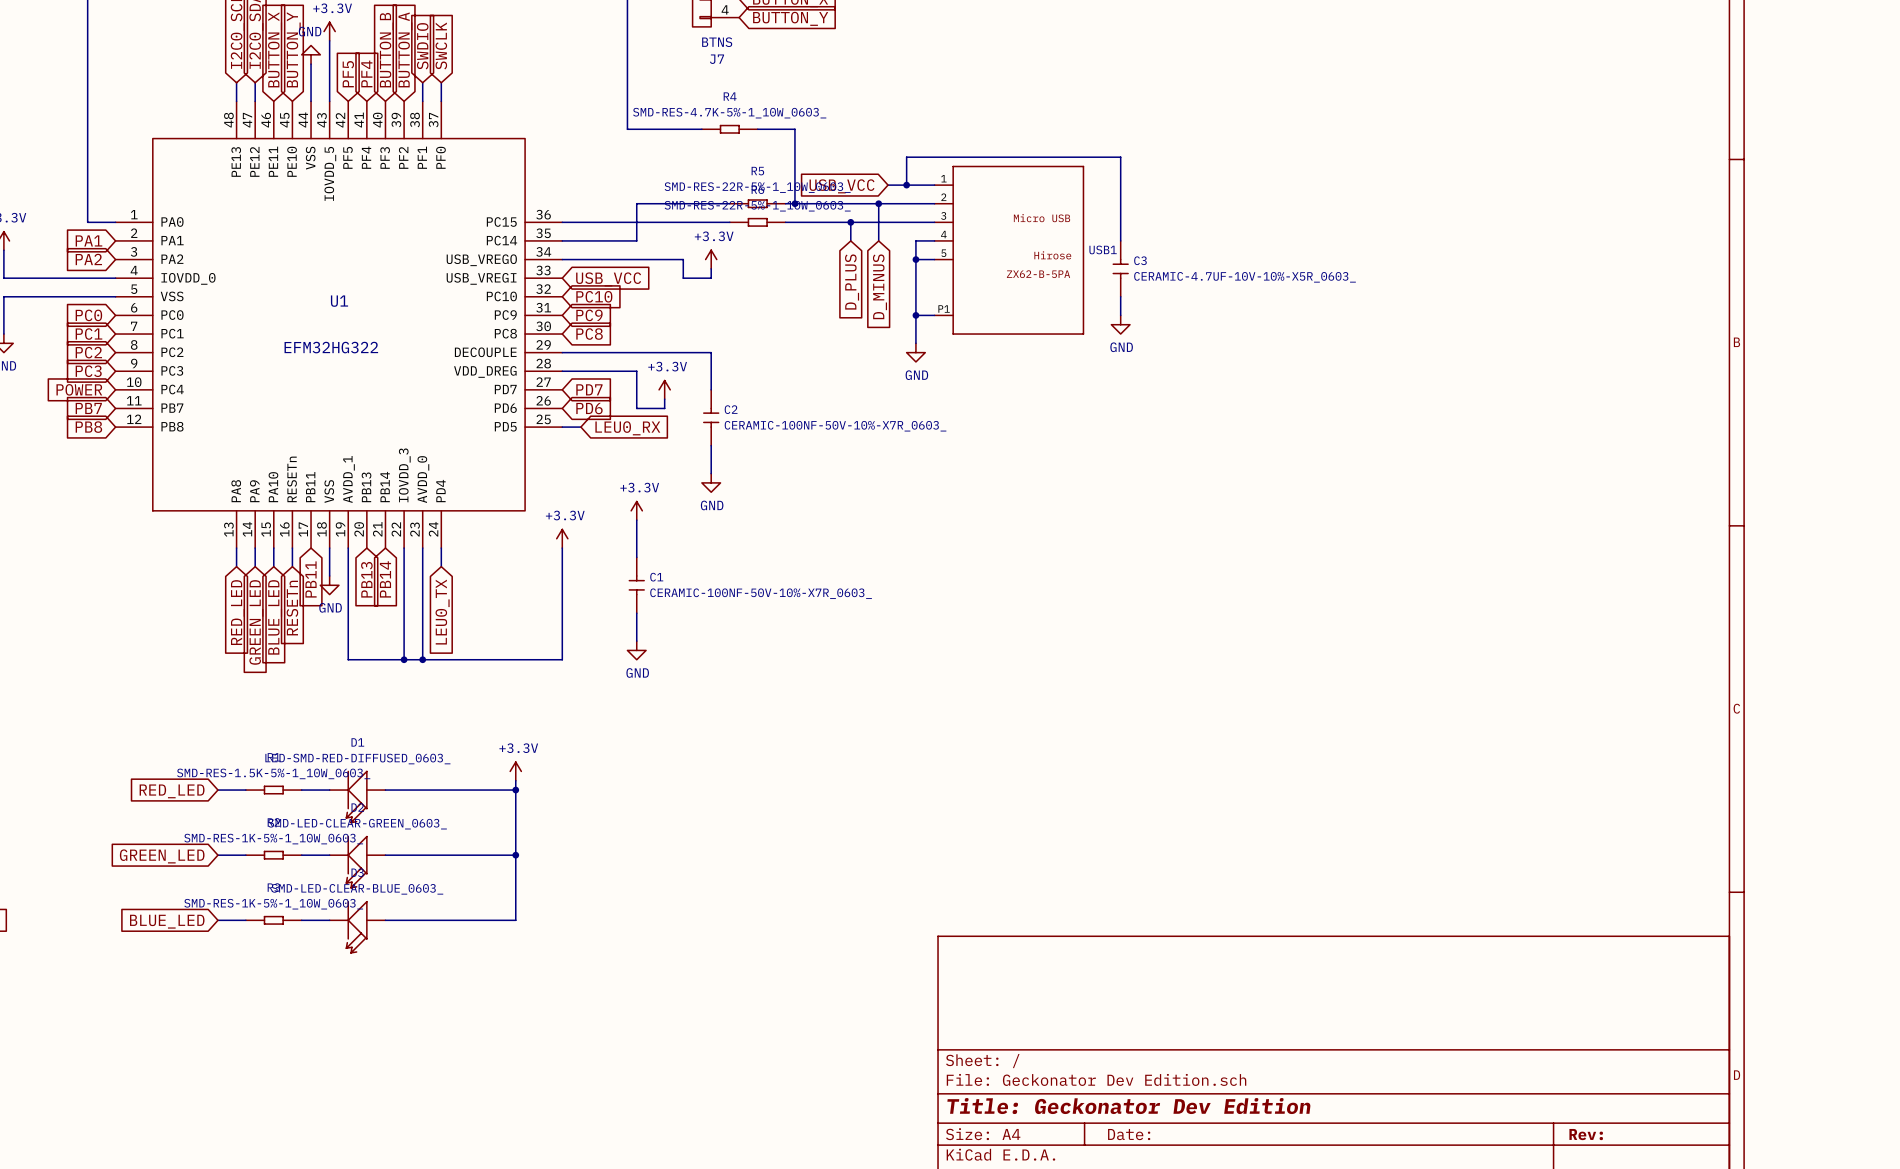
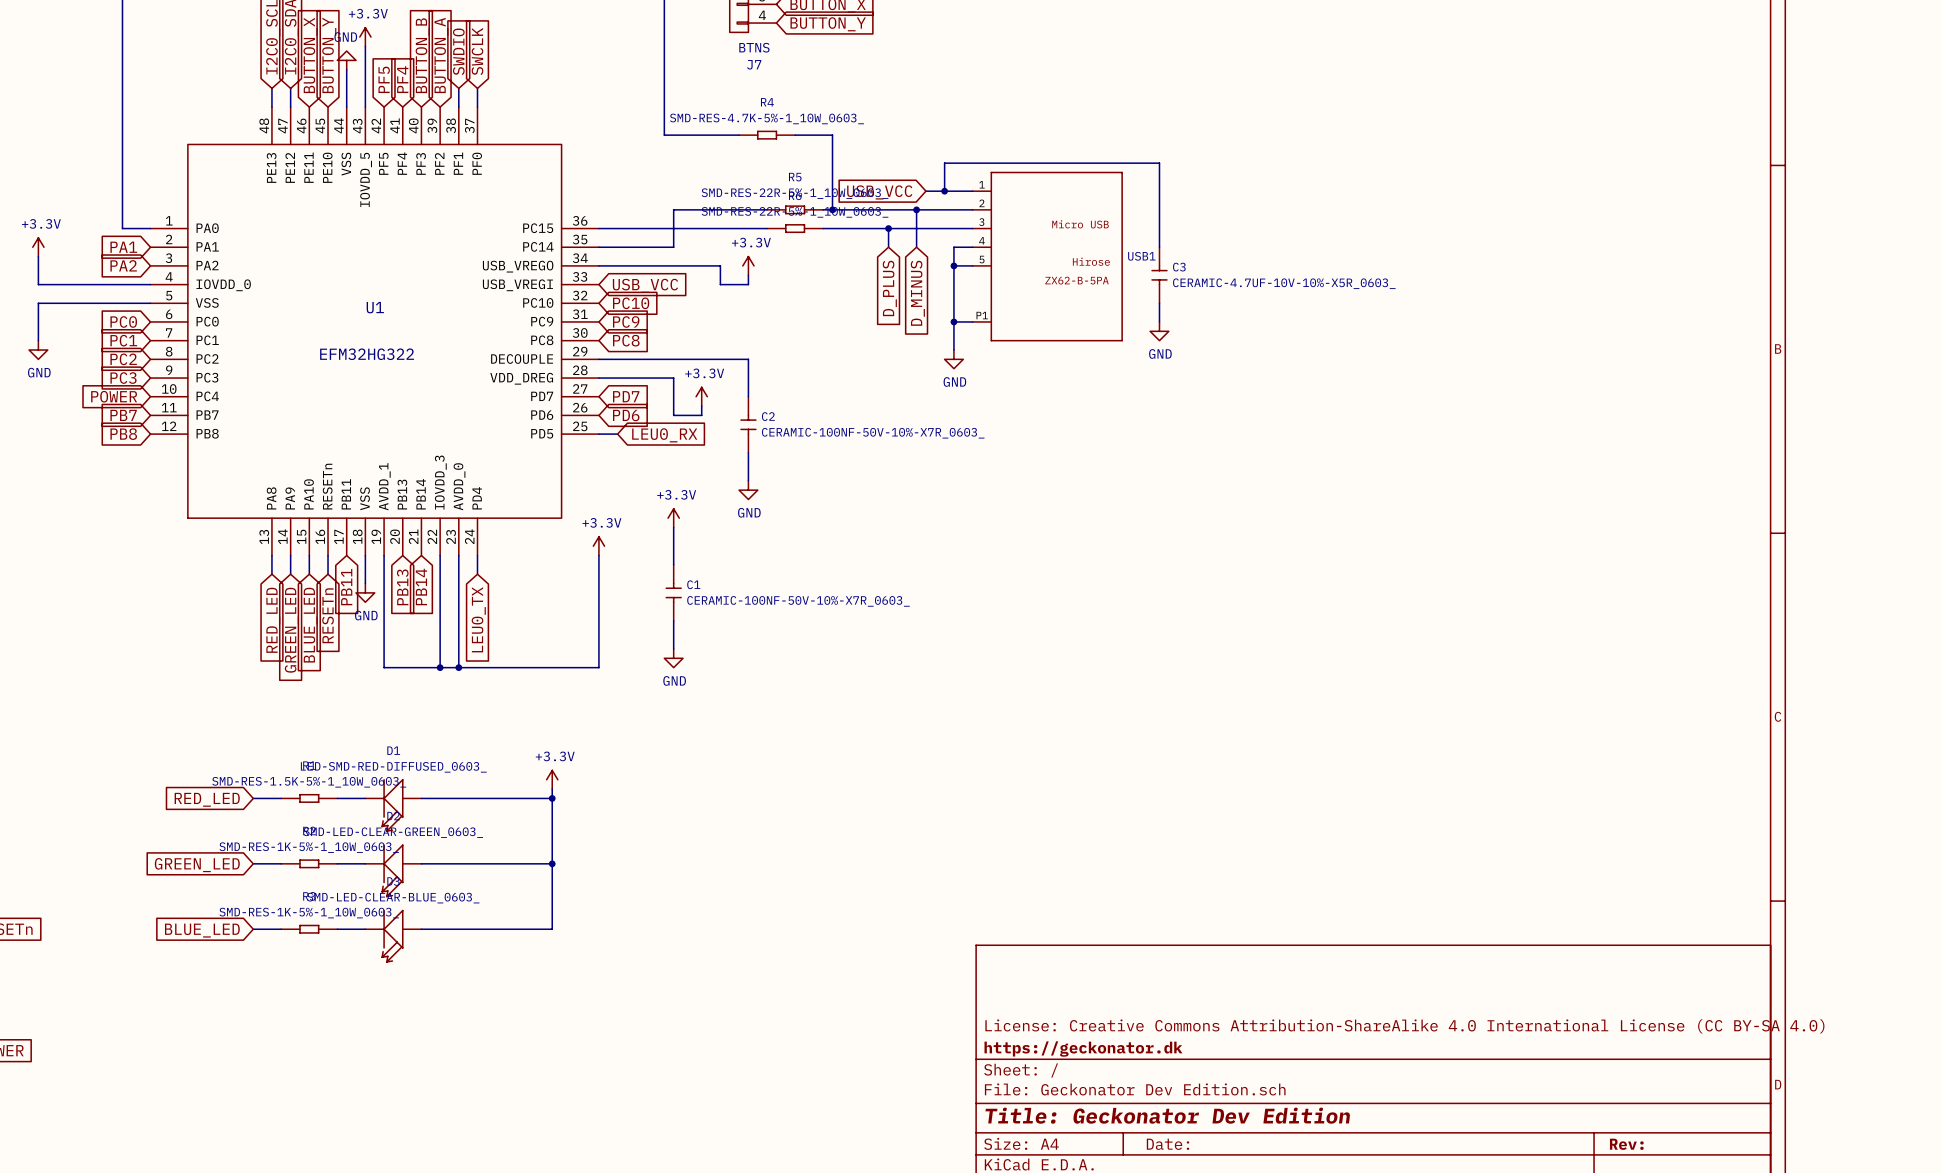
title block: none -> License: Creative Commons Attribution-ShareAlike 4.0 International License (CC BY-SA 4.0) (1404, 1026)
title block: none -> https://geckonator.dk (1083, 1049)

